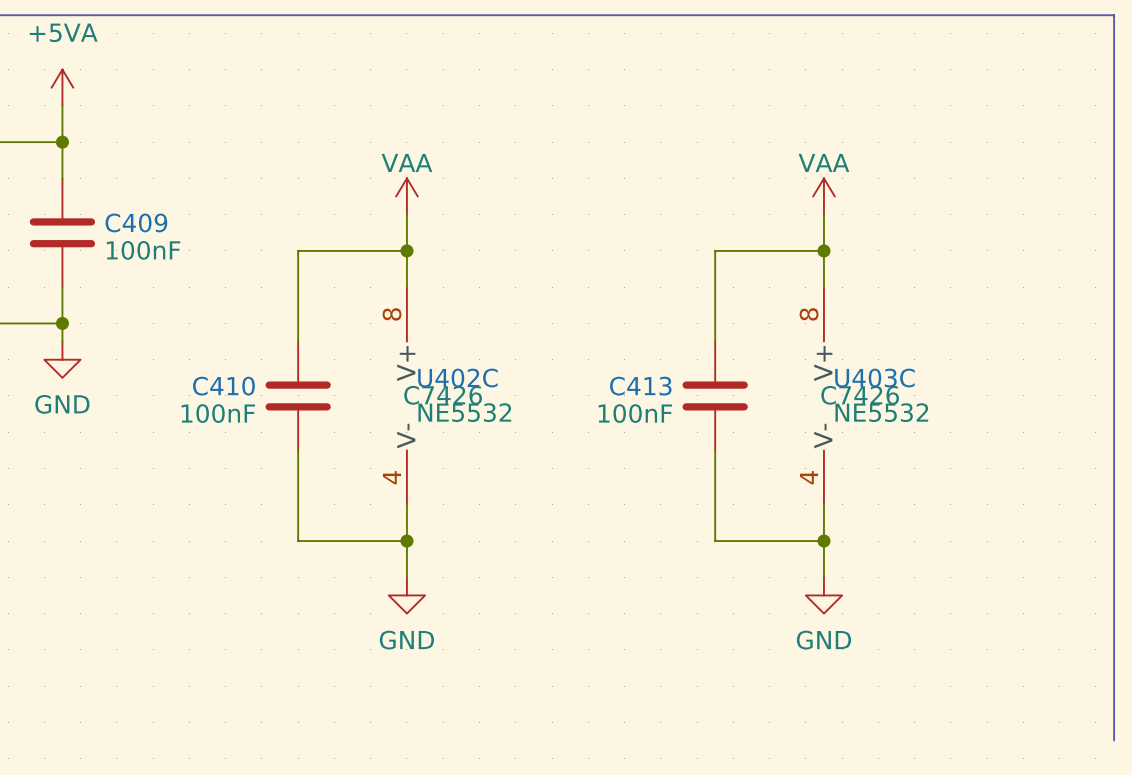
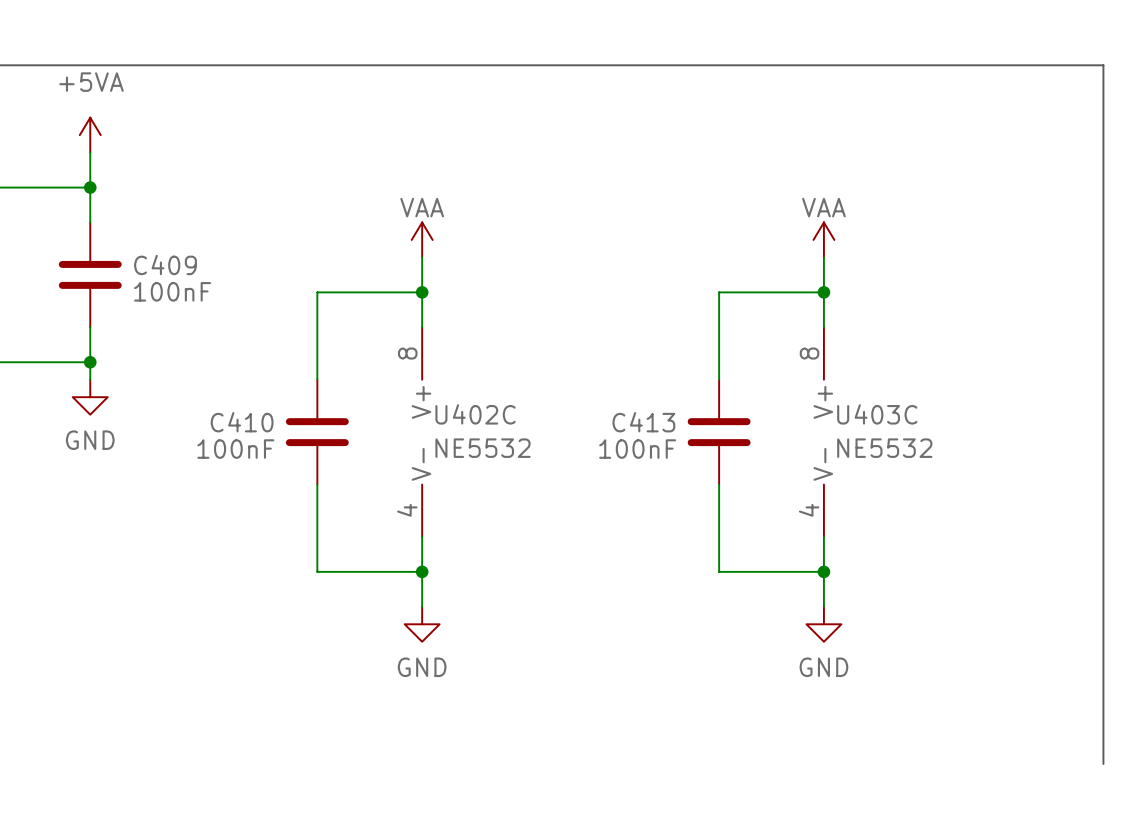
U402C text: C7426 (443, 395) -> none
U403C text: C7426 (860, 395) -> none

